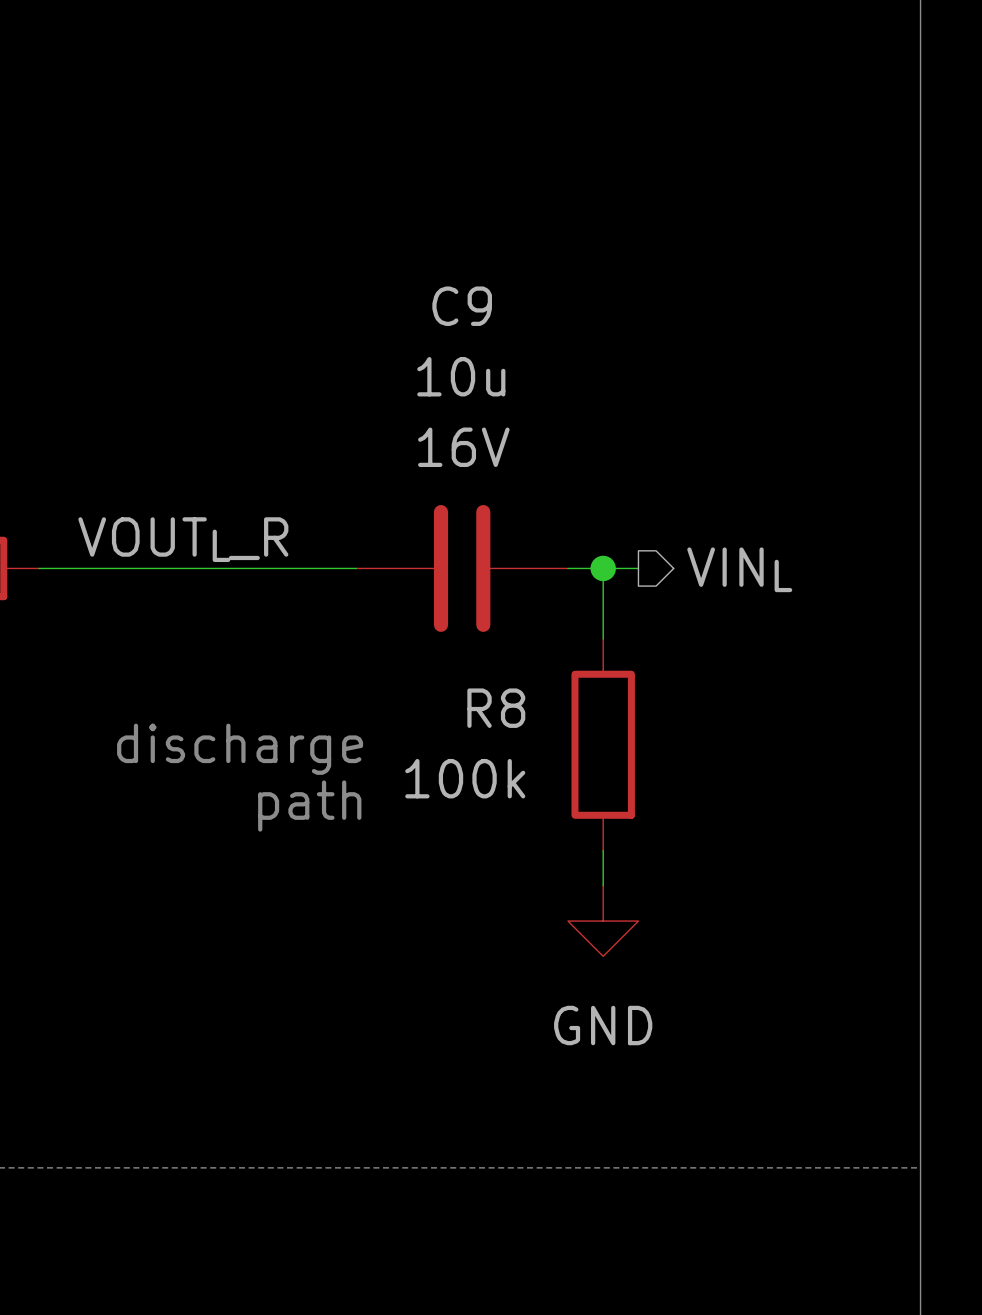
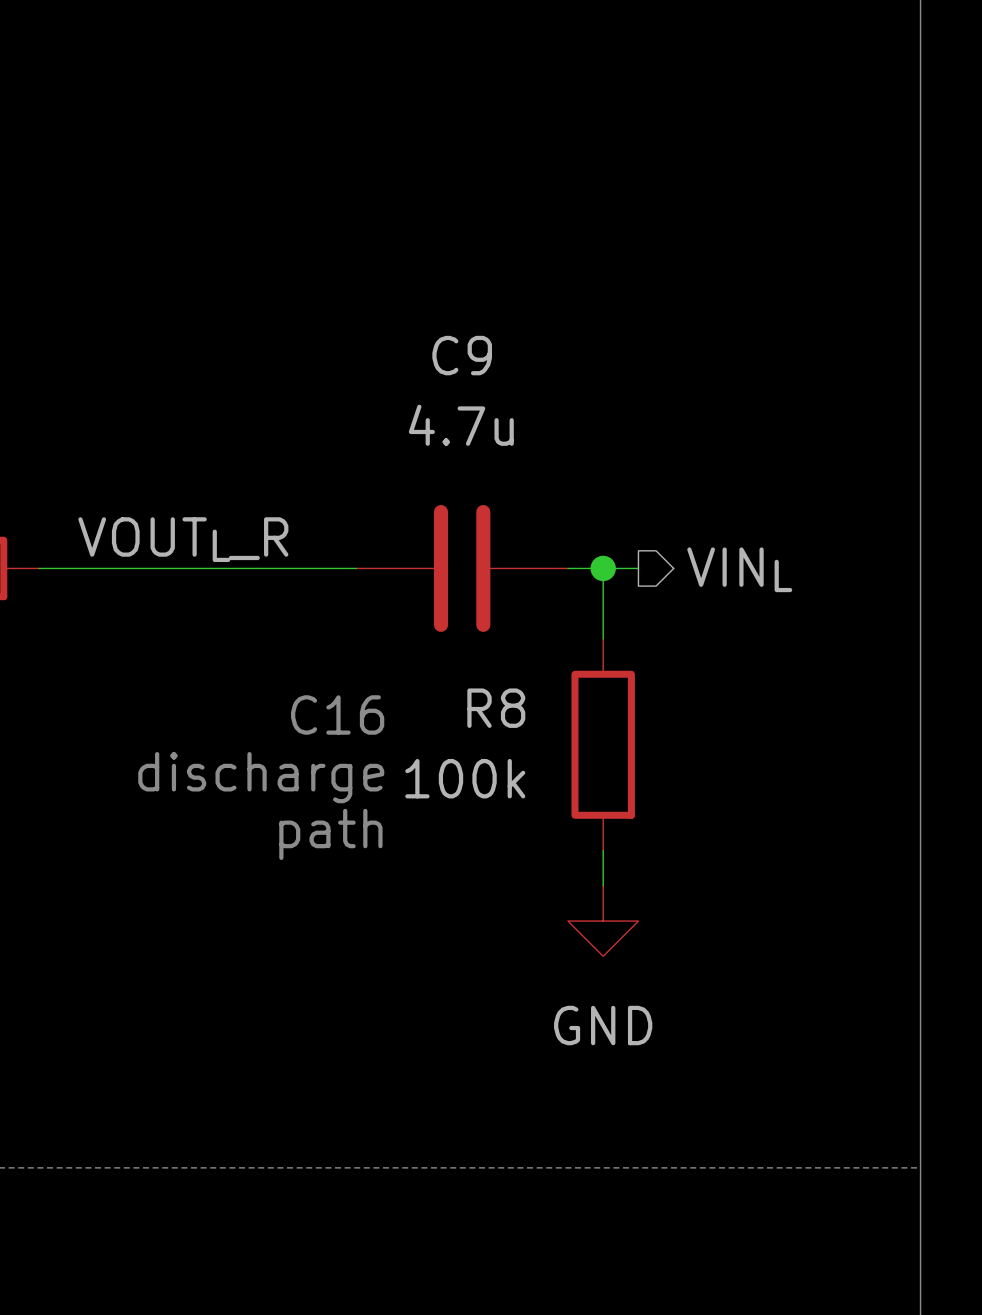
C9 name position: C9 (462, 306) -> C9 (462, 355)
C9 value: 10u (461, 376) -> 4.7u (461, 425)
C9 text: 16V (463, 447) -> none
text: none -> C16 (337, 714)
text position: discharge (240, 749) -> discharge (261, 777)
text position: path (309, 806) -> path (330, 834)

